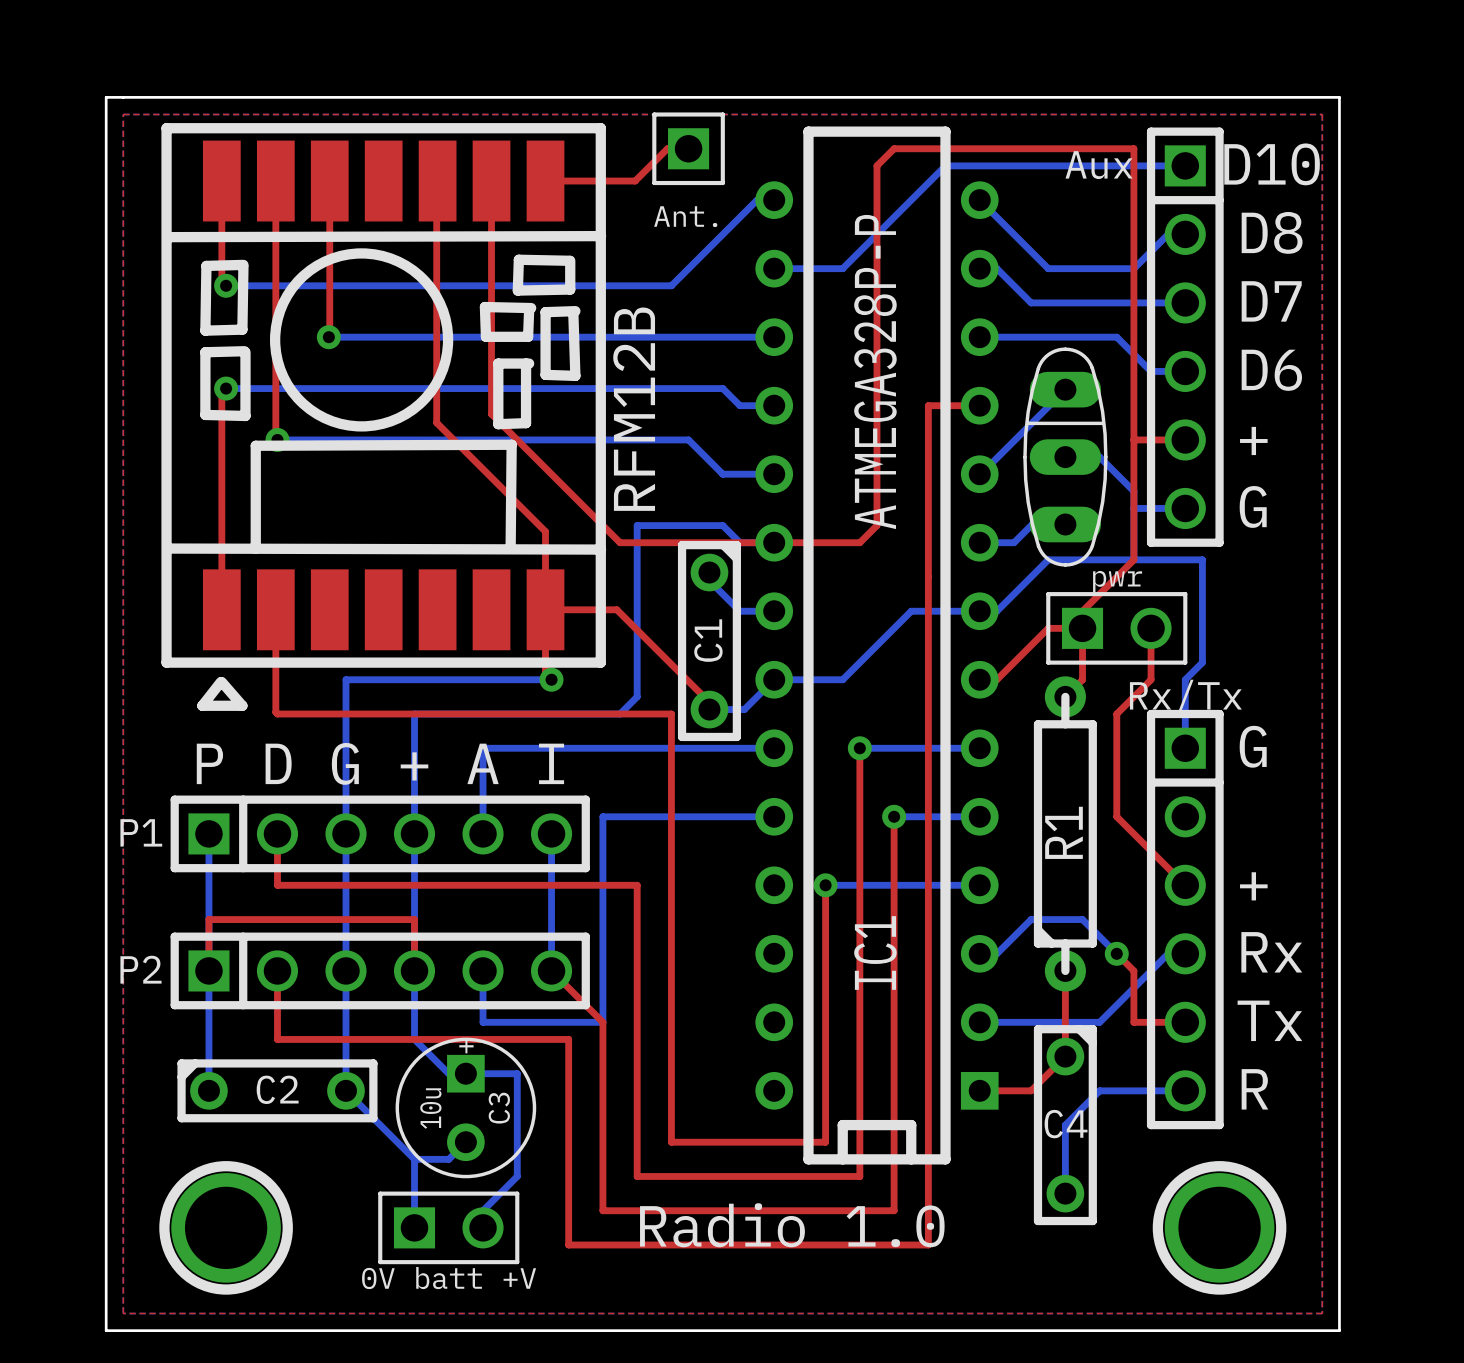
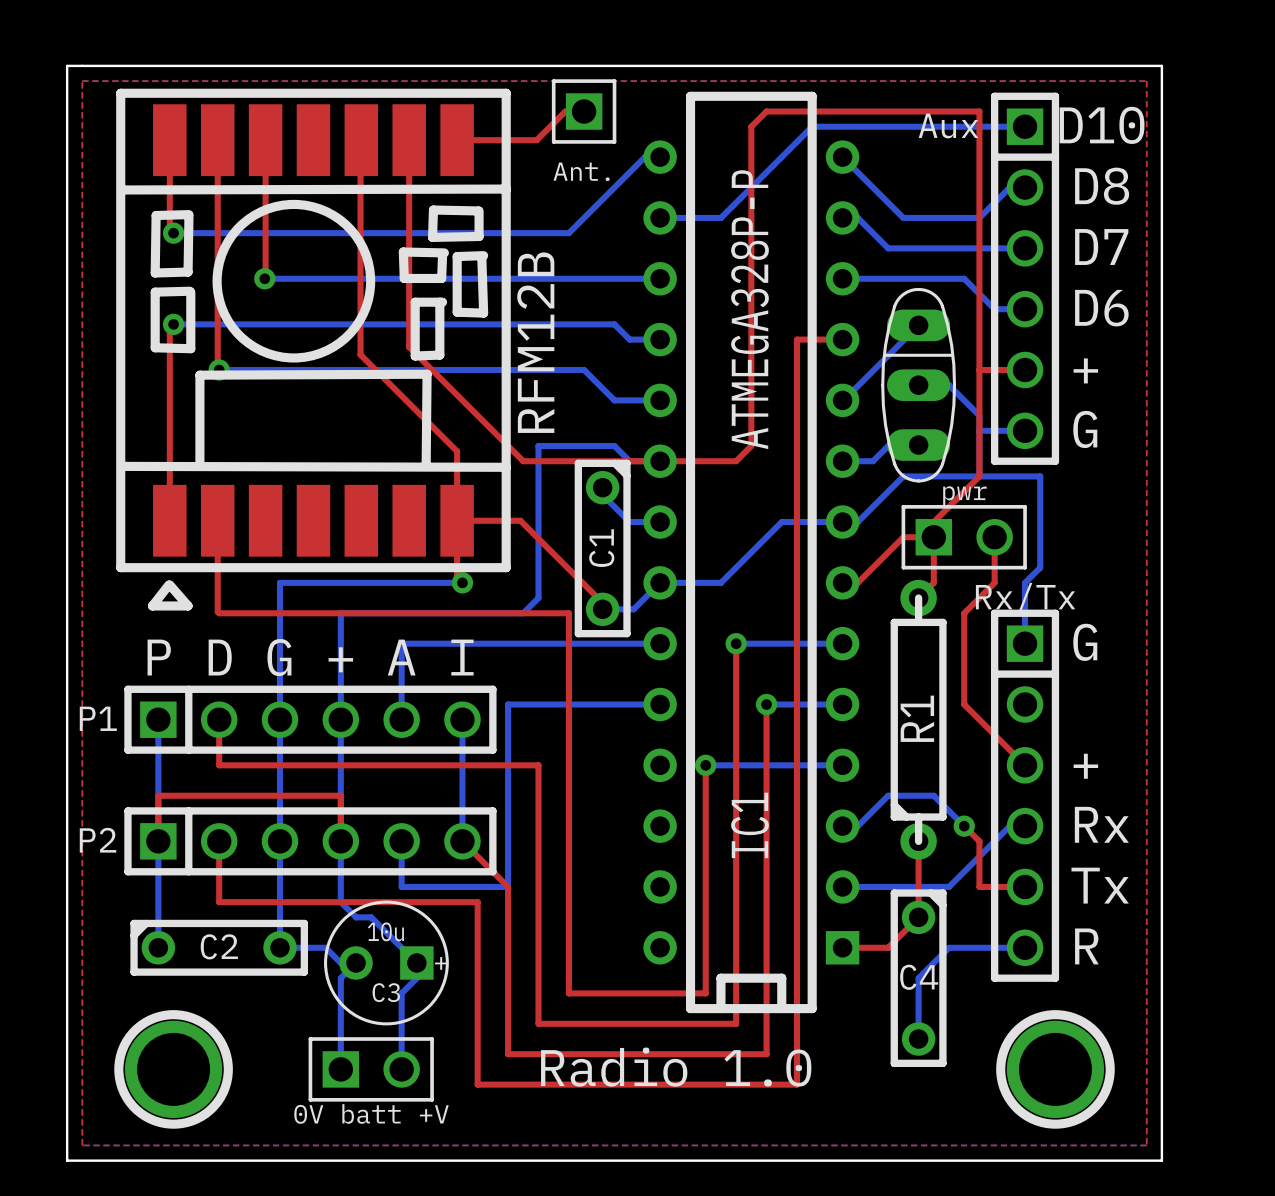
bottom track: (431, 1056) (448, 1073) (517, 1073) (517, 1176) (483, 1210) -> (356, 917) (371, 917) (416, 962) (416, 978) (401, 993) (401, 1054)
bottom track: (345, 1090) (414, 1159) (448, 1159) (465, 1142) -> (280, 947) (325, 947) (340, 962) (356, 962) (340, 978) (340, 1008)
C3 rotation: 0° (465, 1107) -> 90° clockwise (386, 962)

